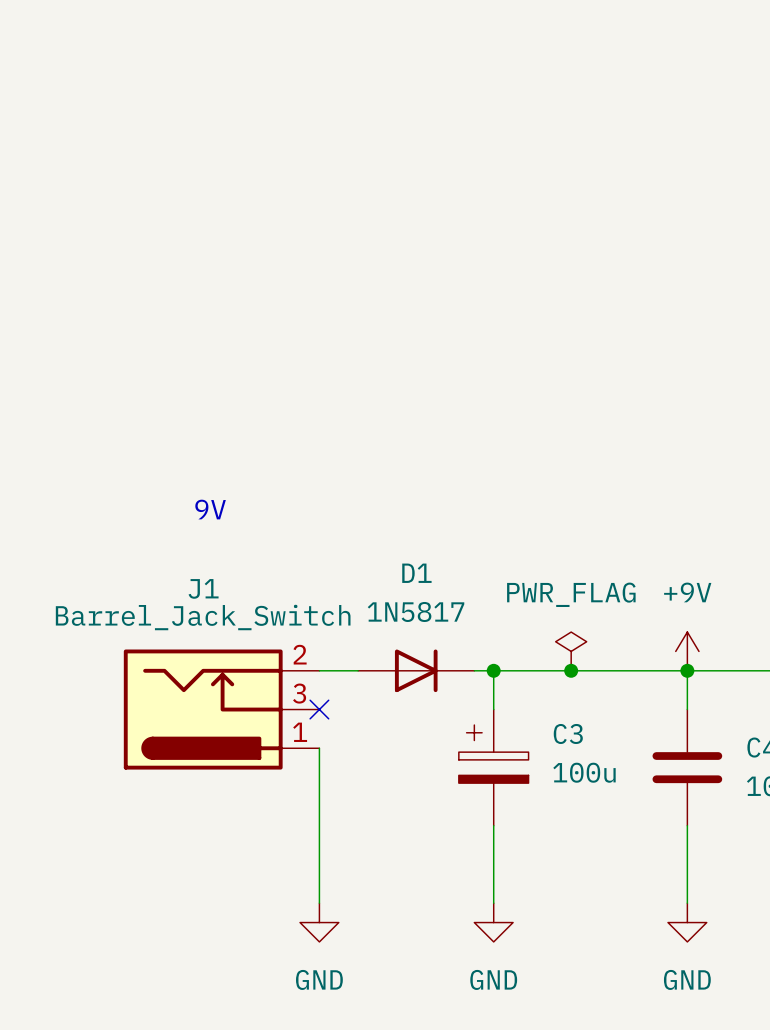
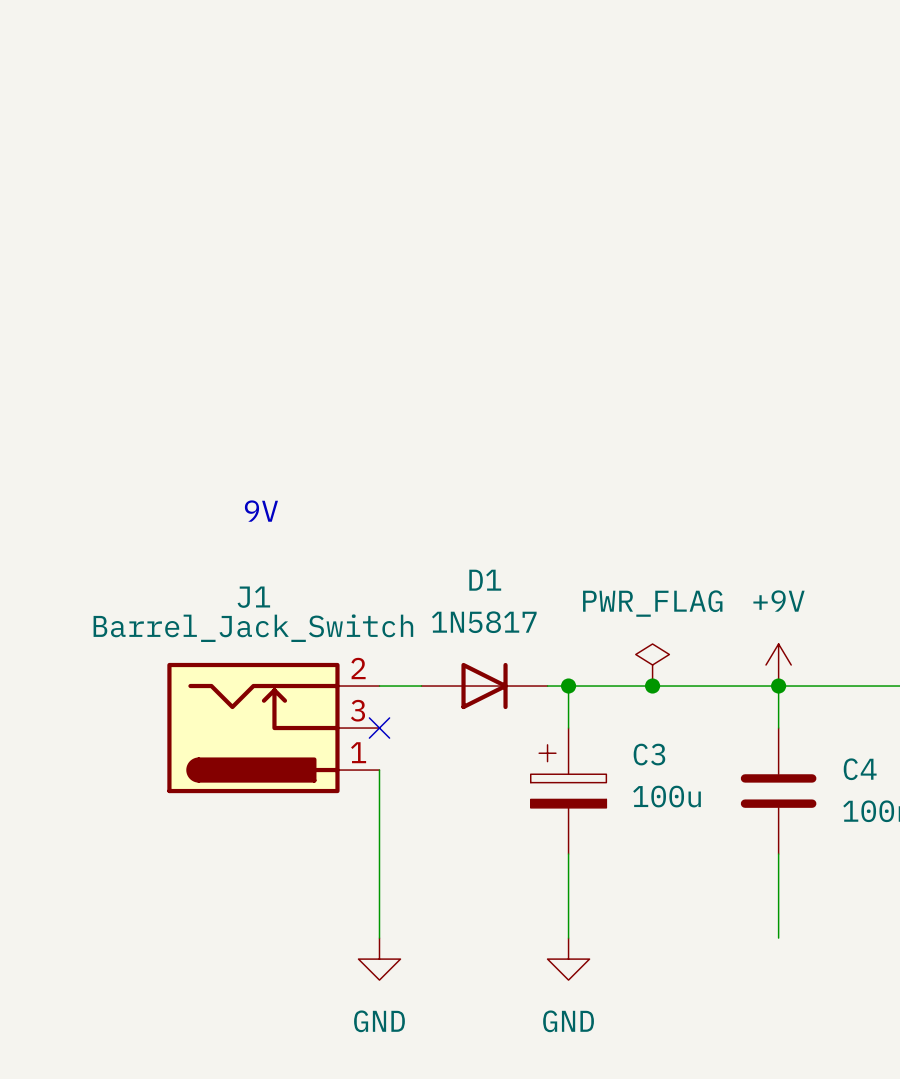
power symbol: GND (687, 922) -> none

